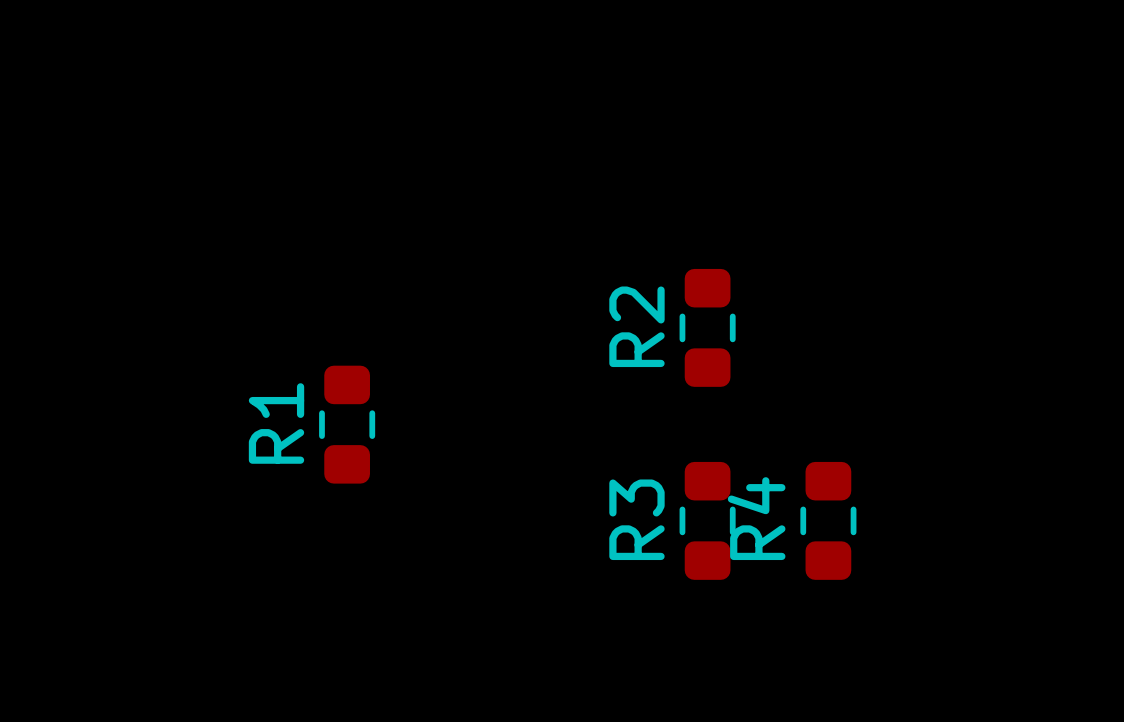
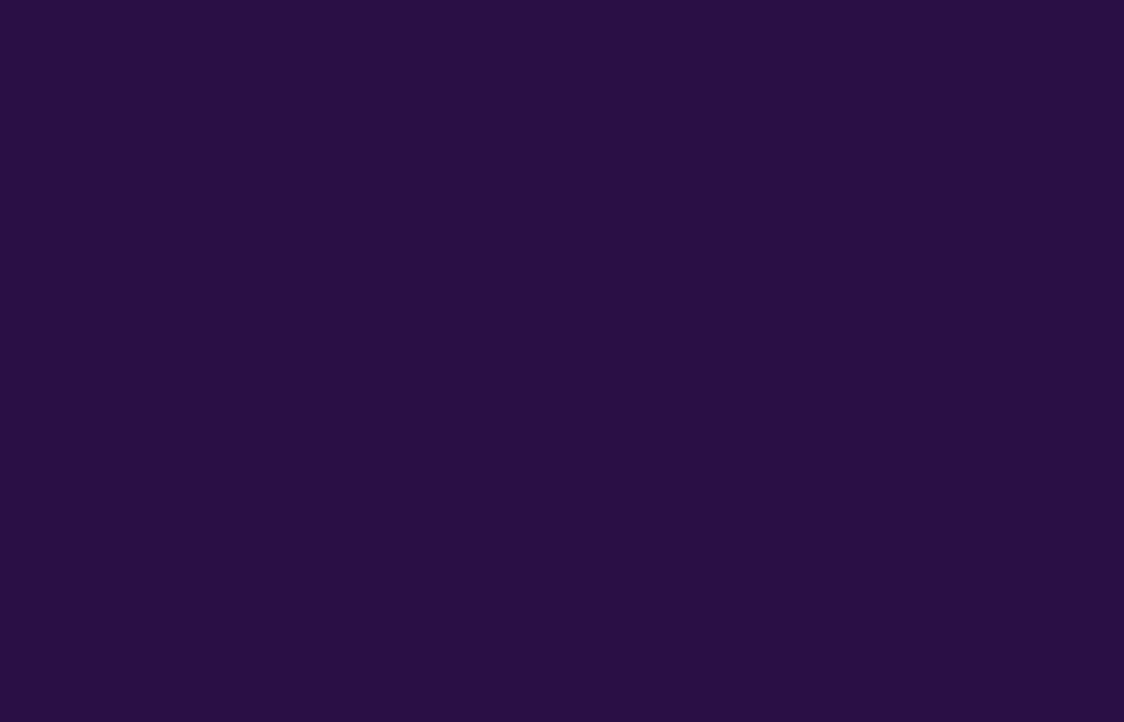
R2: (707, 327) -> none
R1: (347, 424) -> none
R3: (707, 520) -> none
R4: (828, 520) -> none

